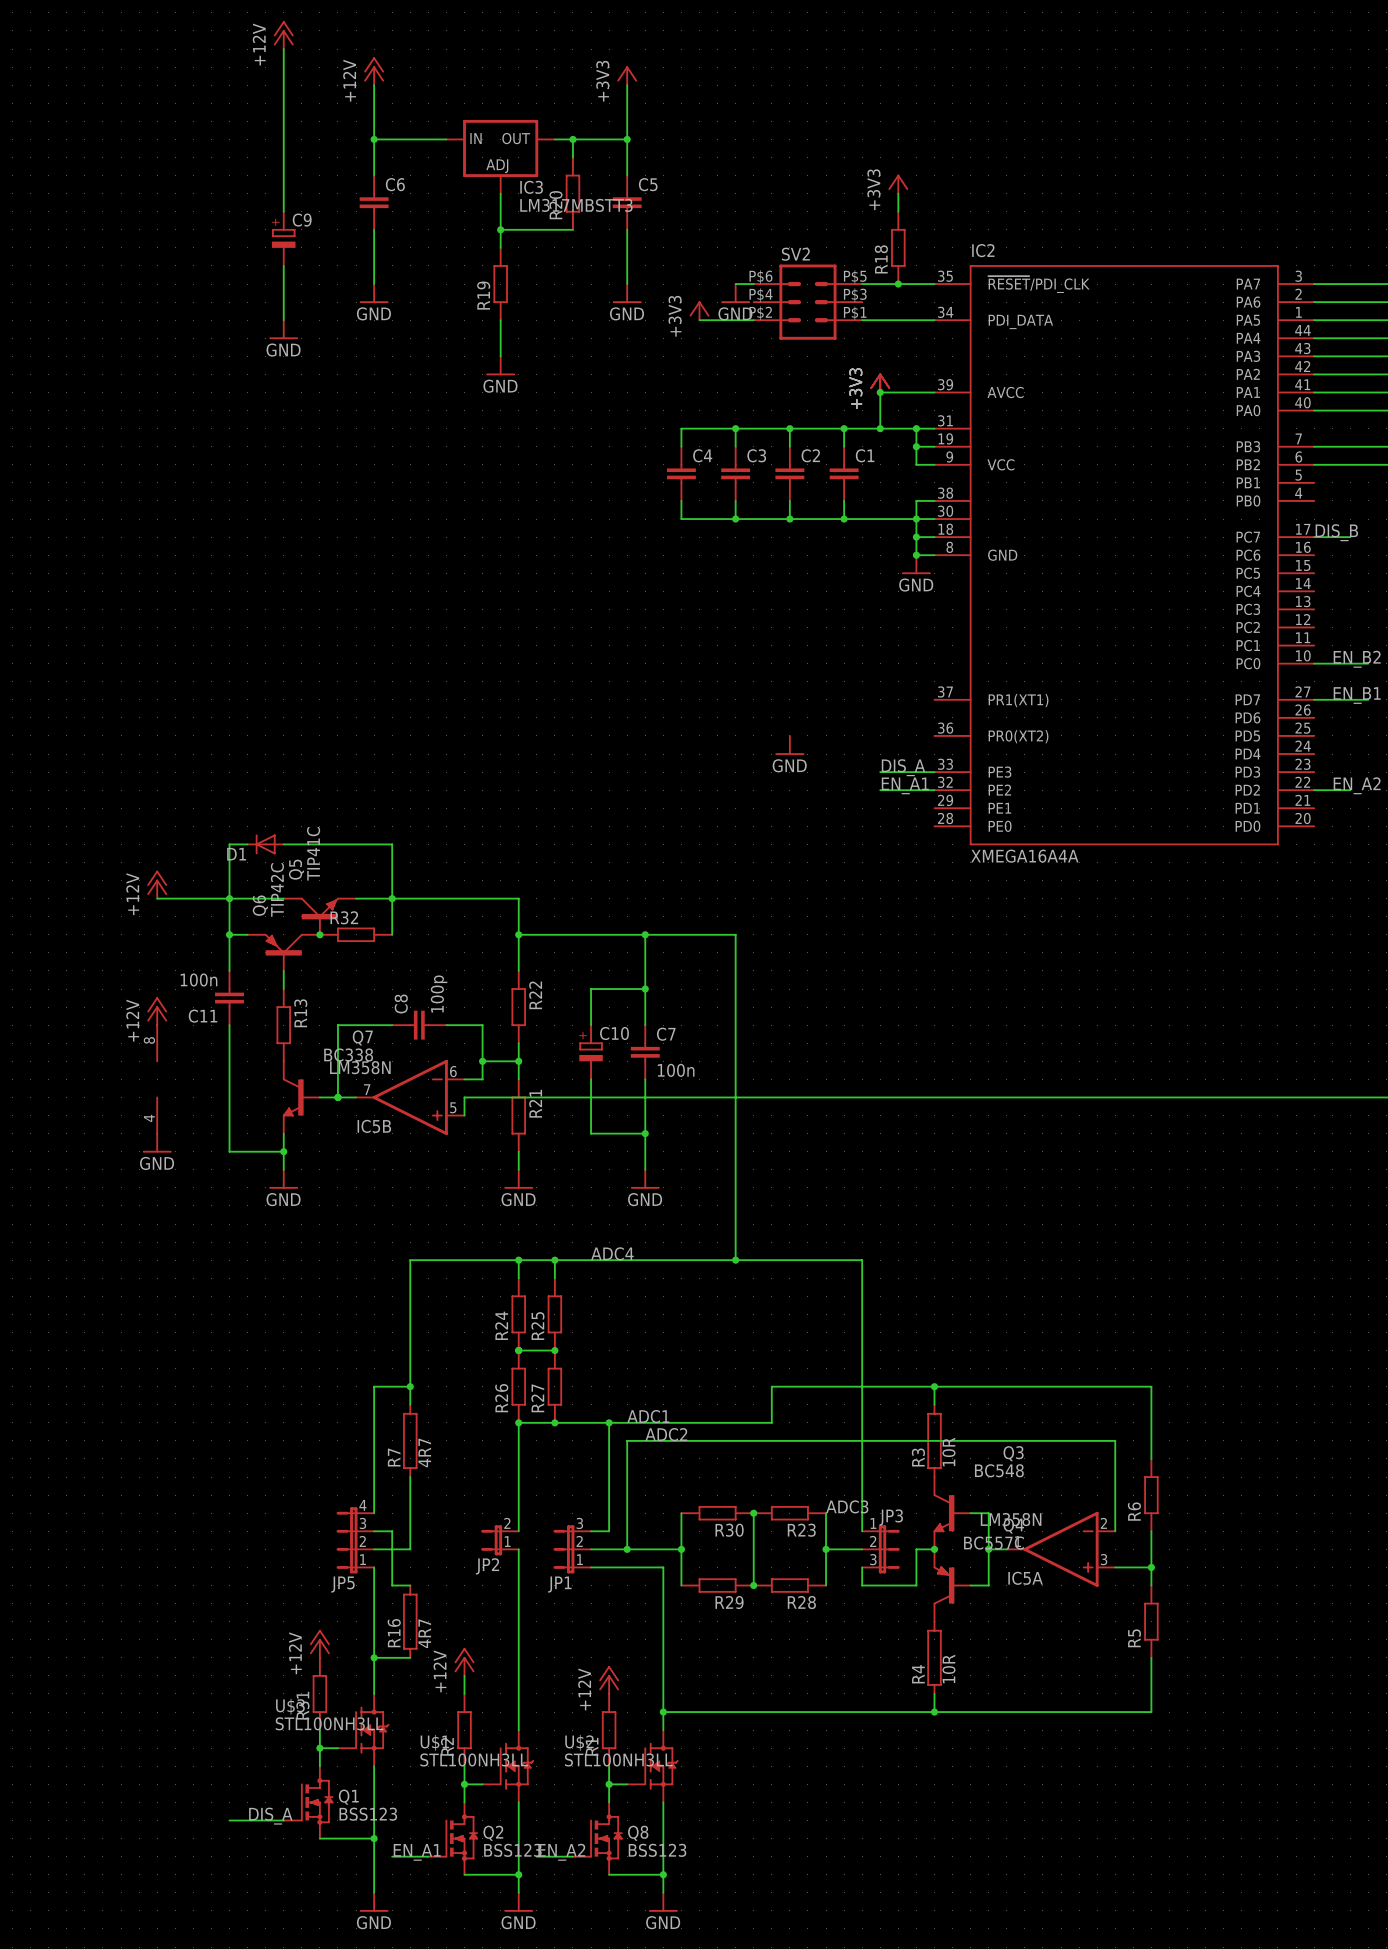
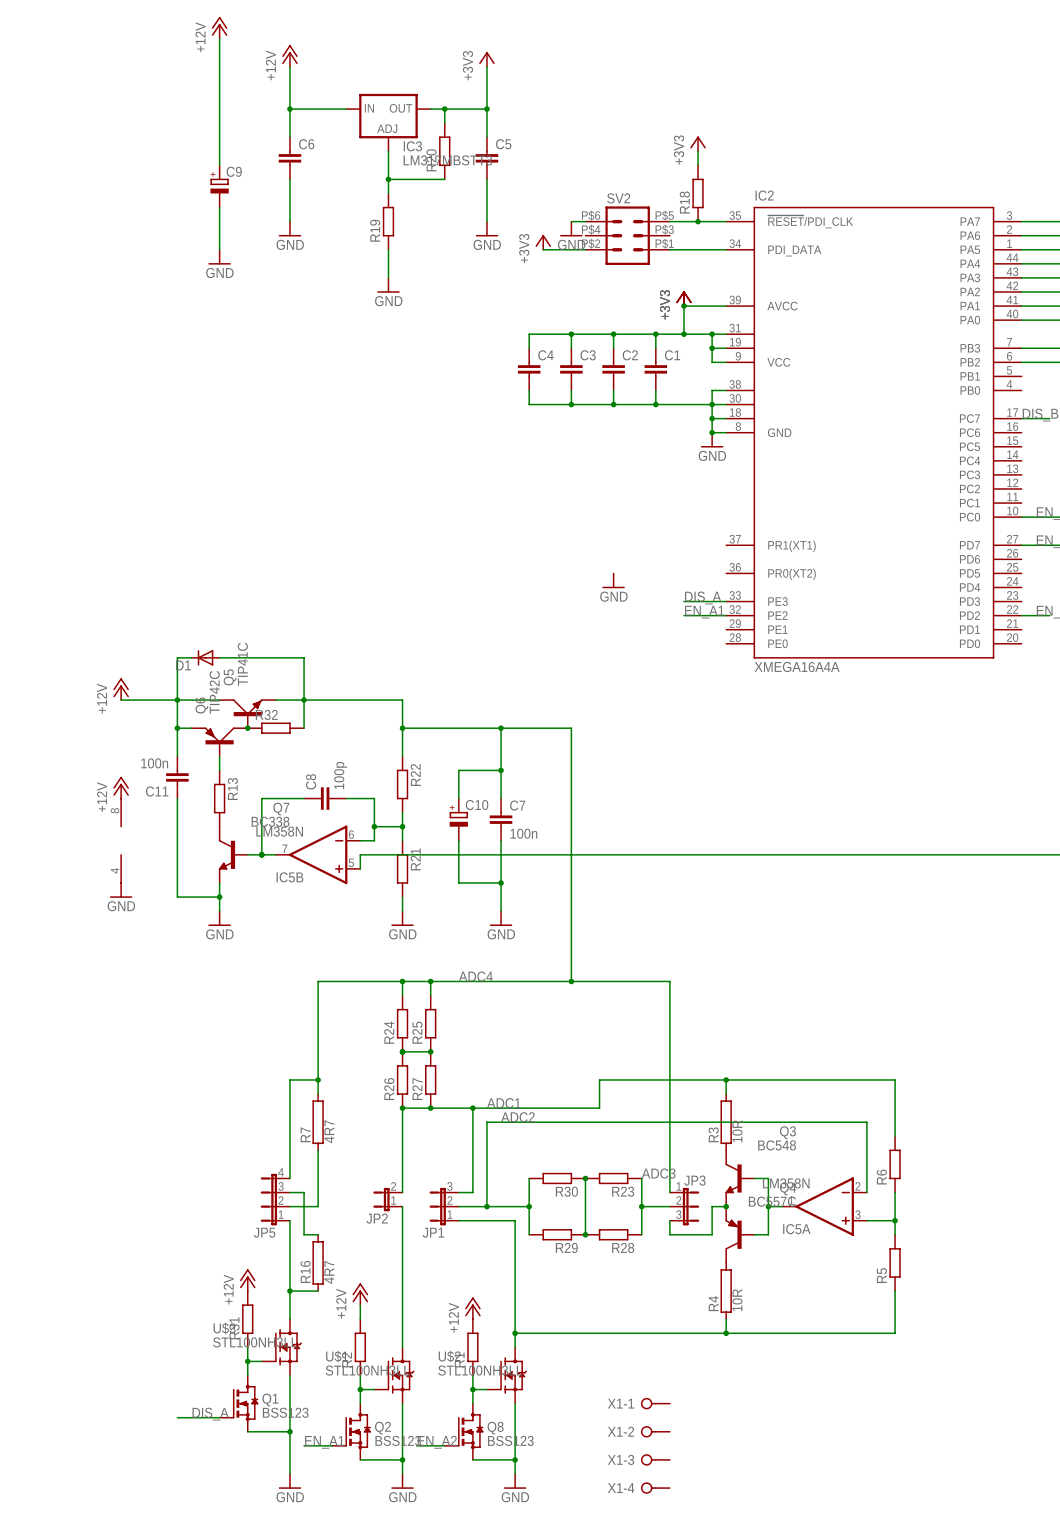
X1-1: none -> (655, 1403)
X1-2: none -> (655, 1431)
X1-3: none -> (655, 1459)
X1-4: none -> (655, 1488)

